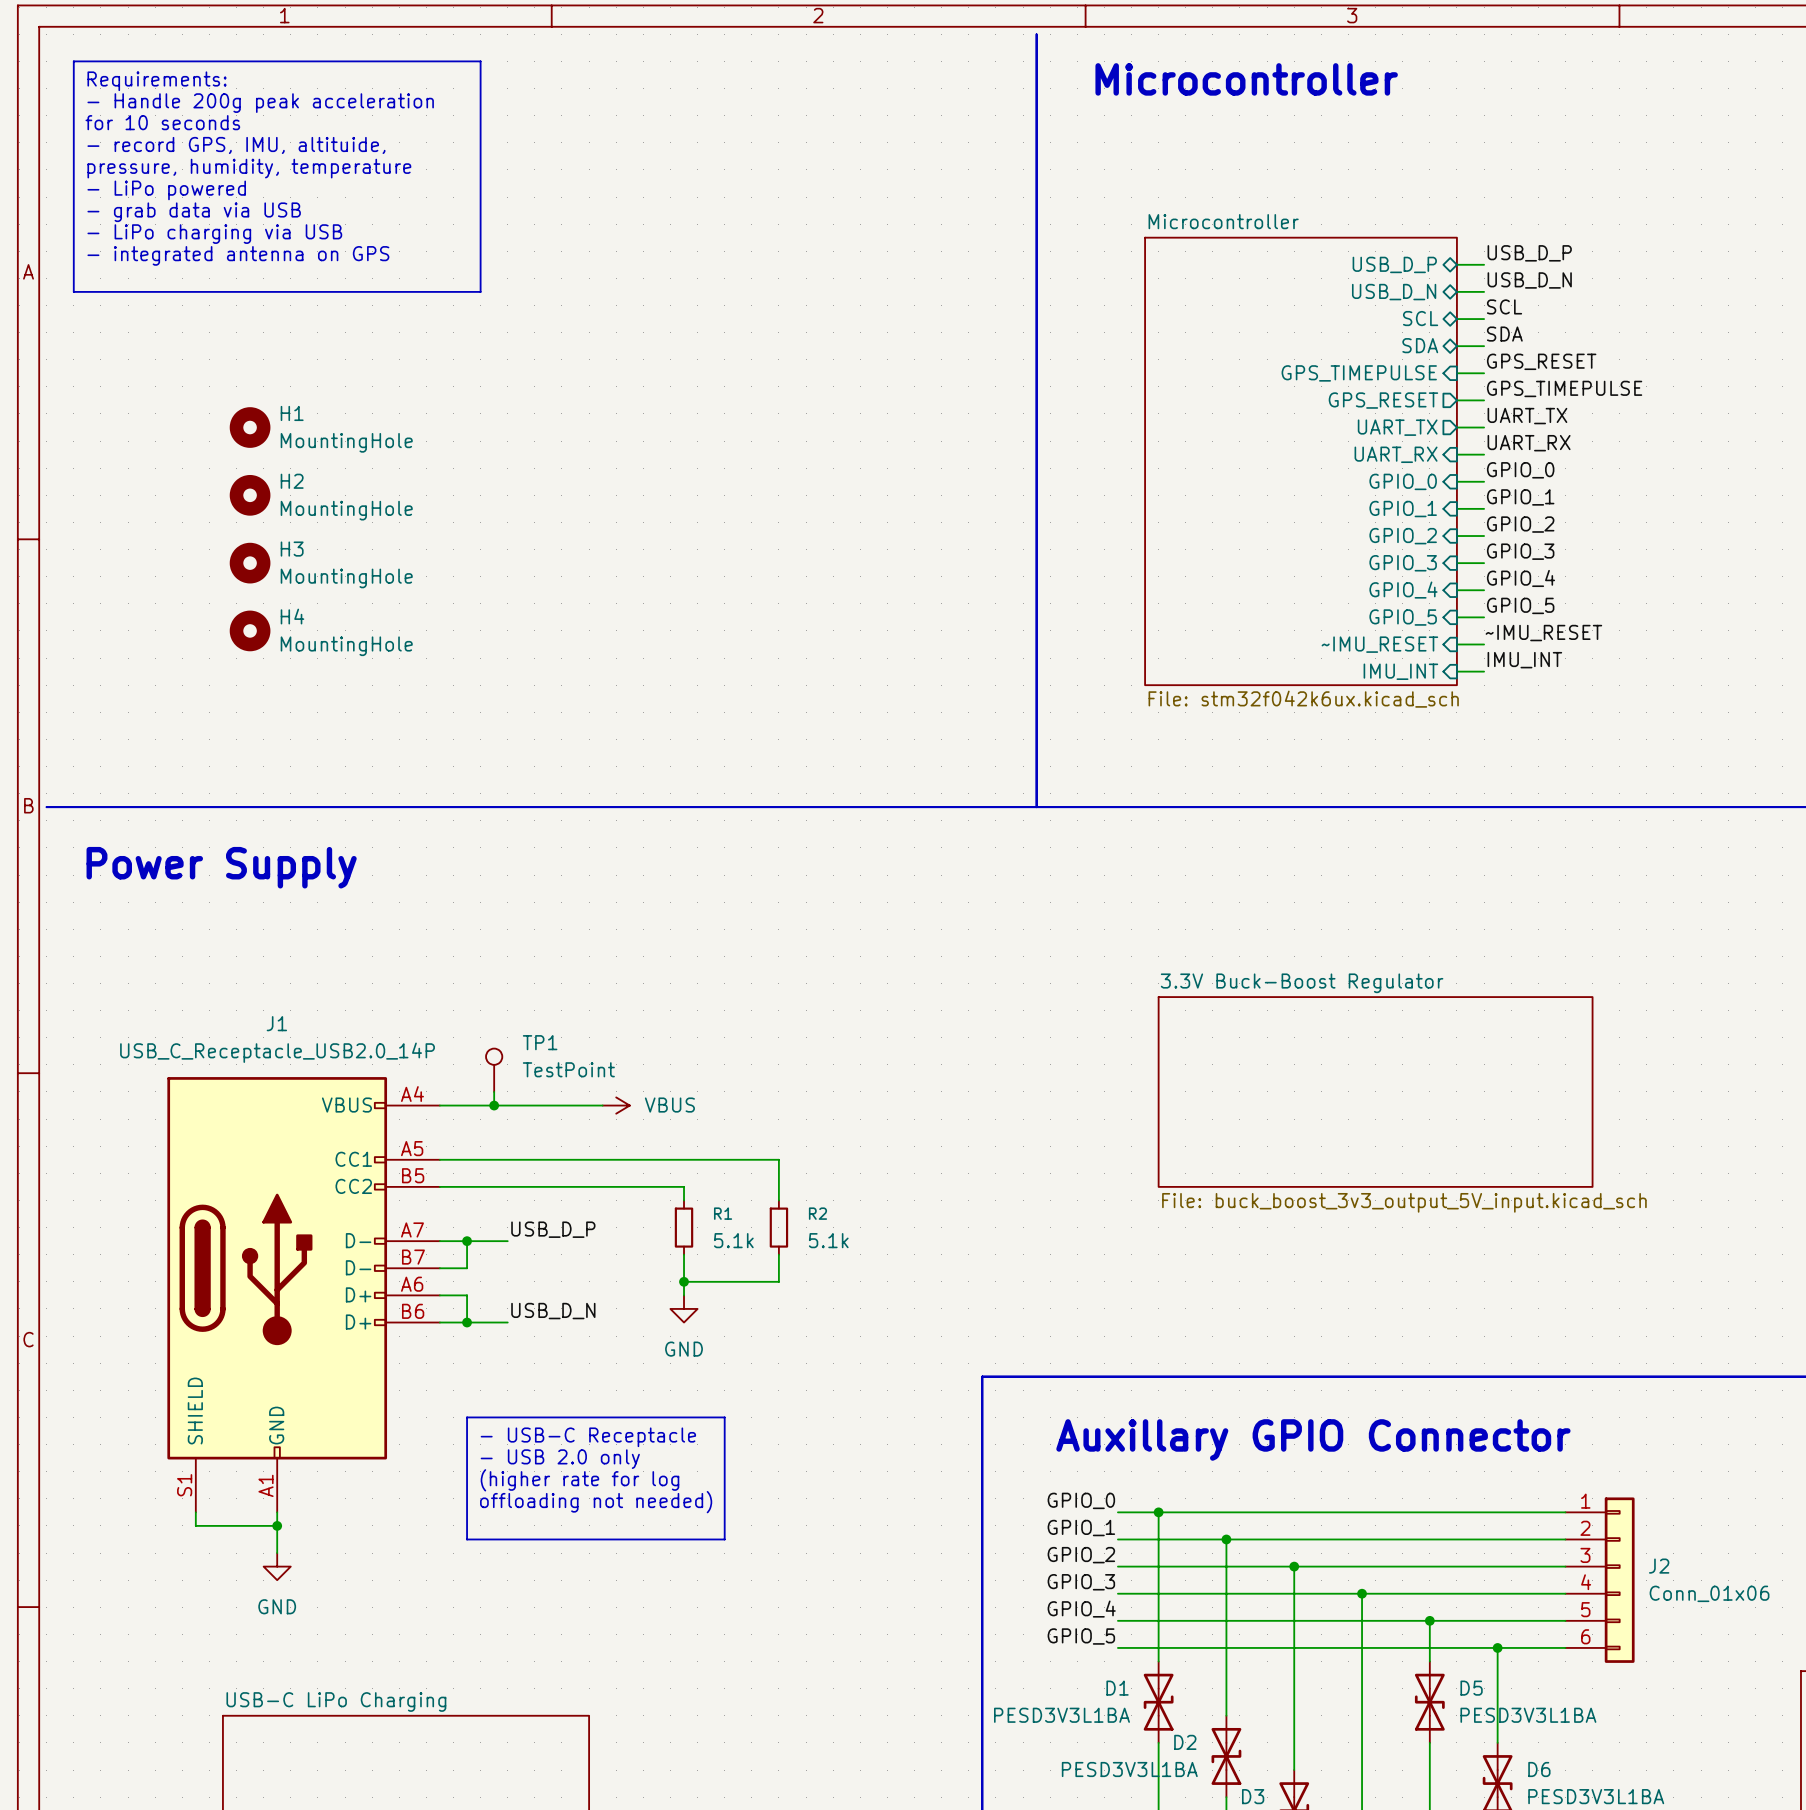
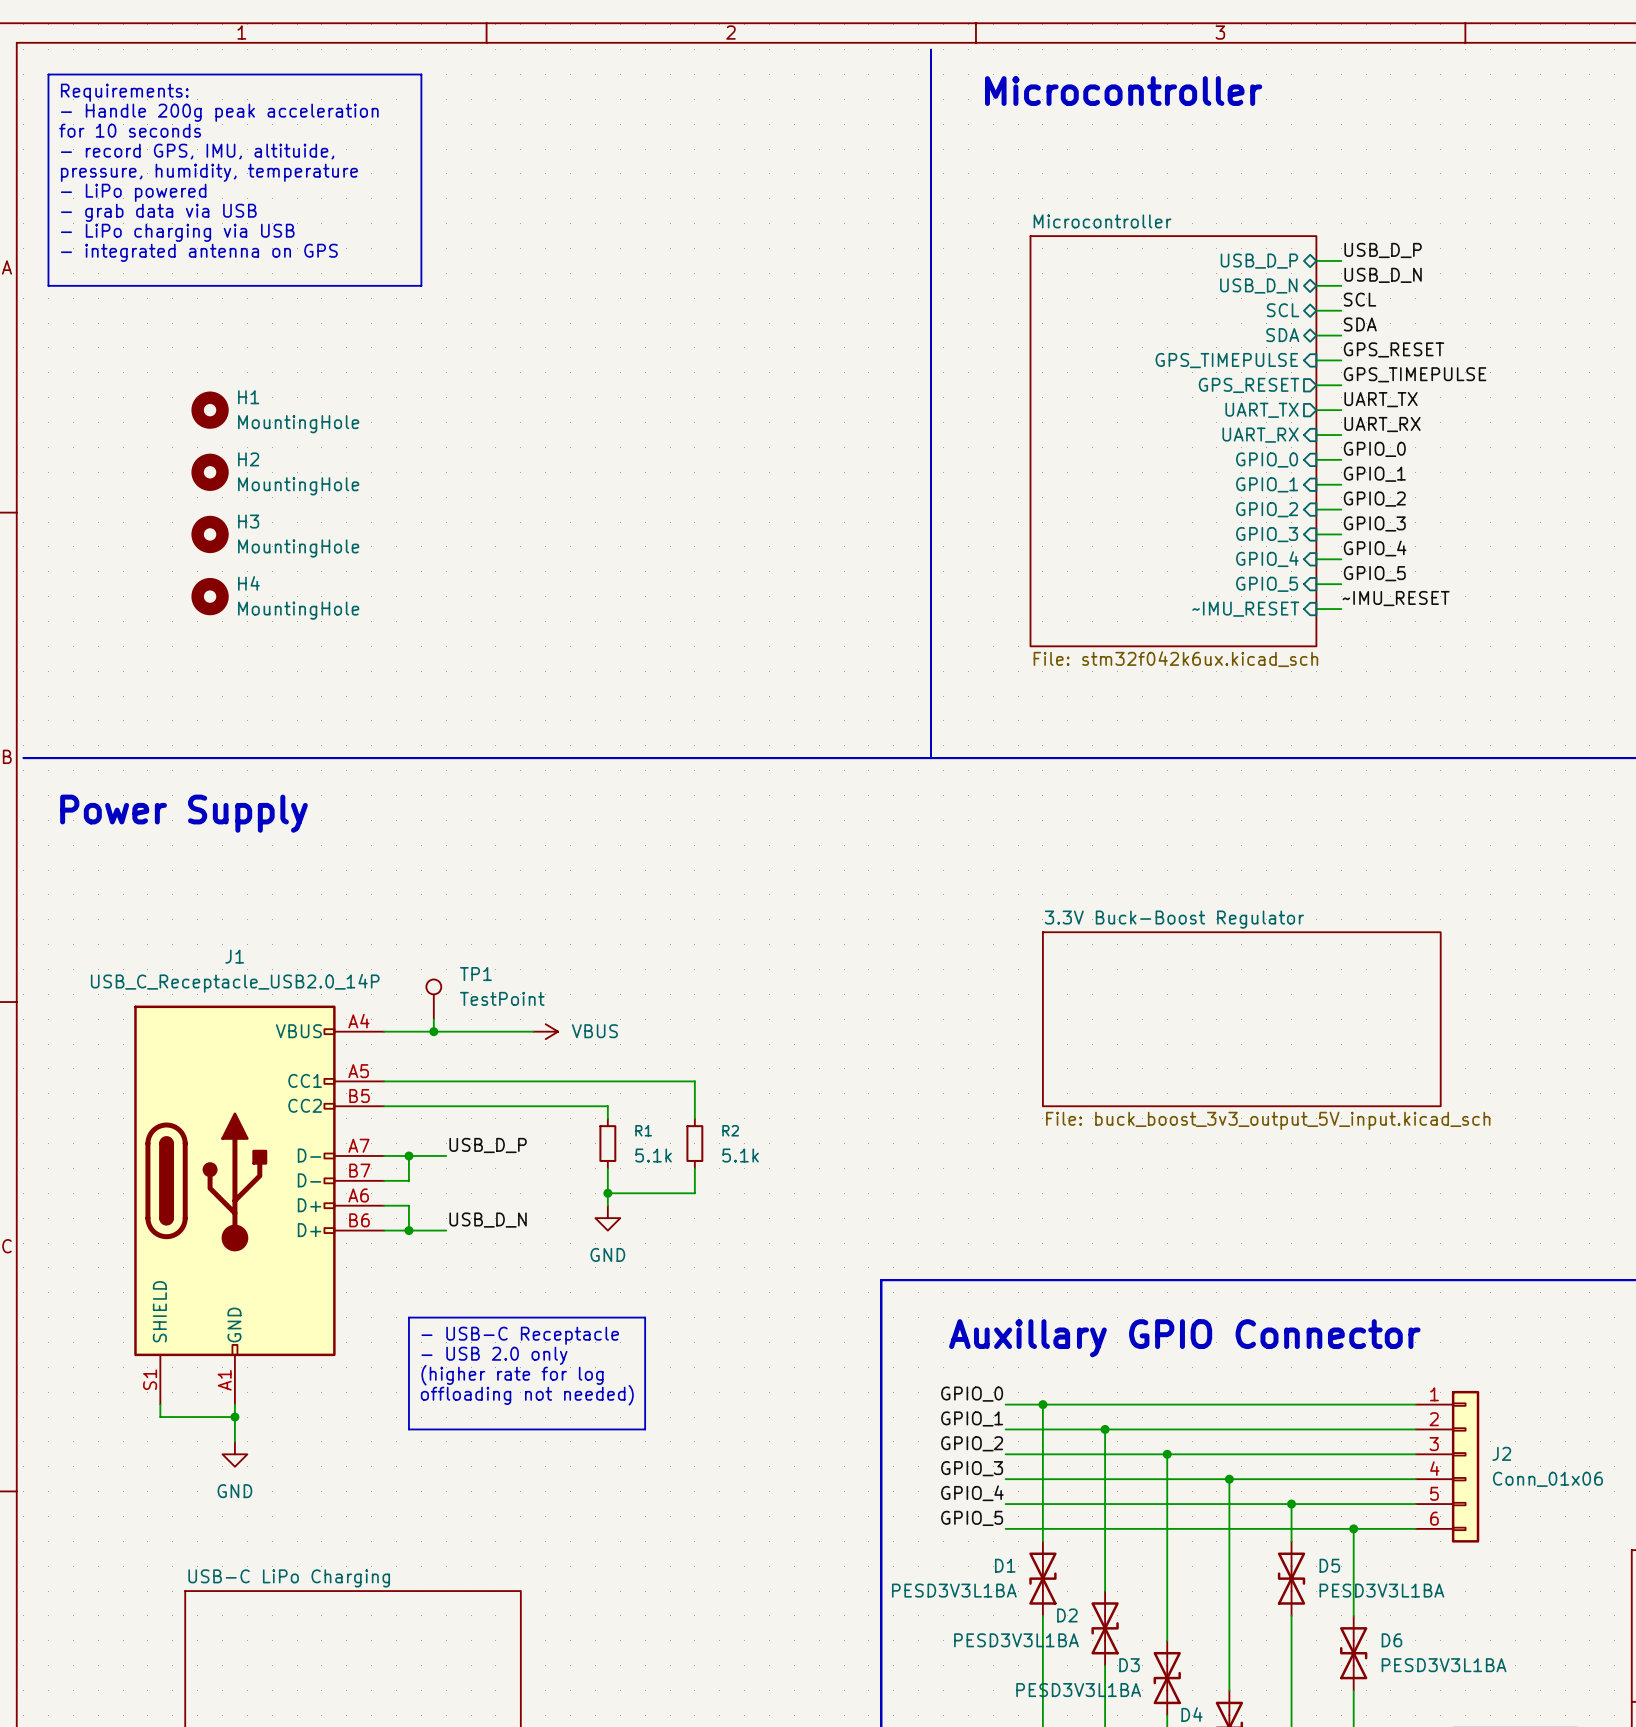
label: IMU_INT (1524, 660) -> none
sheet pin: IMU_INT (1400, 671) -> none
wire: (1456, 671) (1484, 671) -> none

